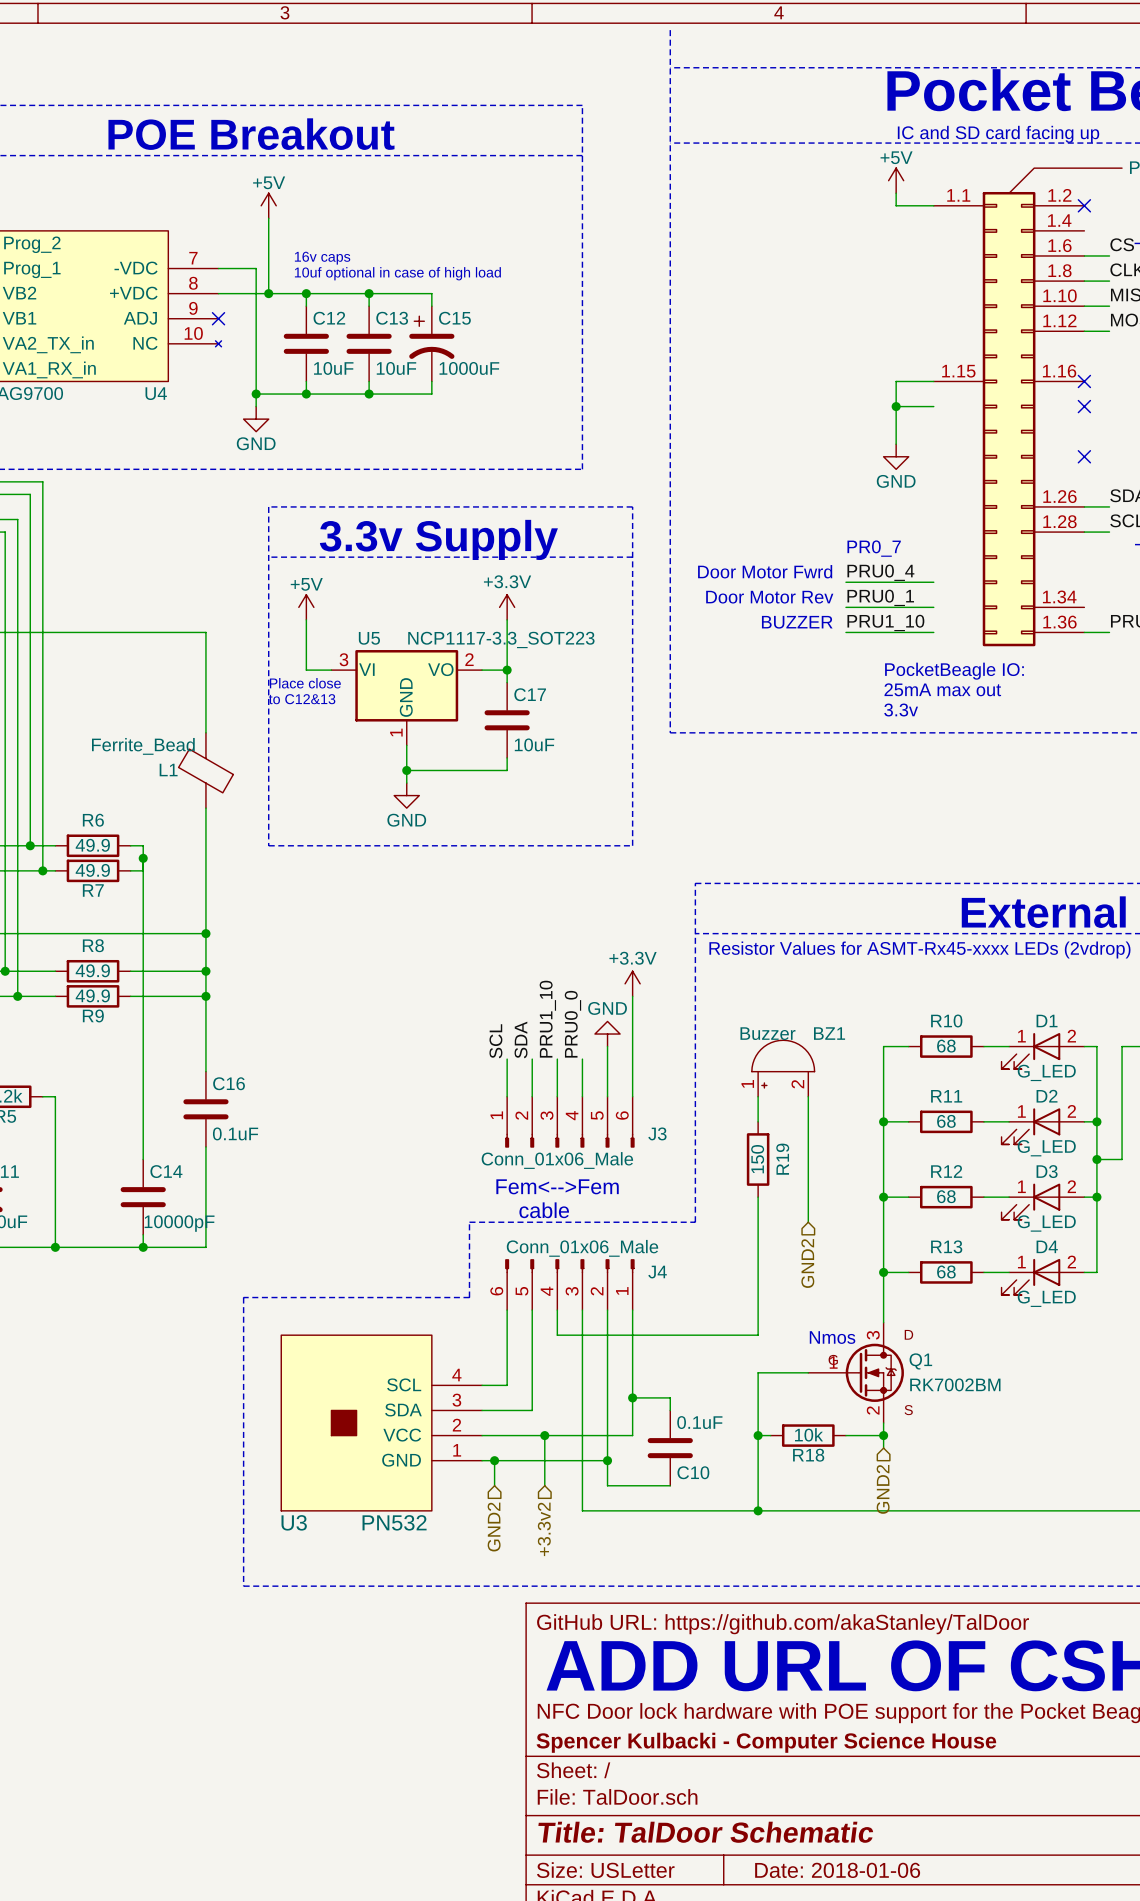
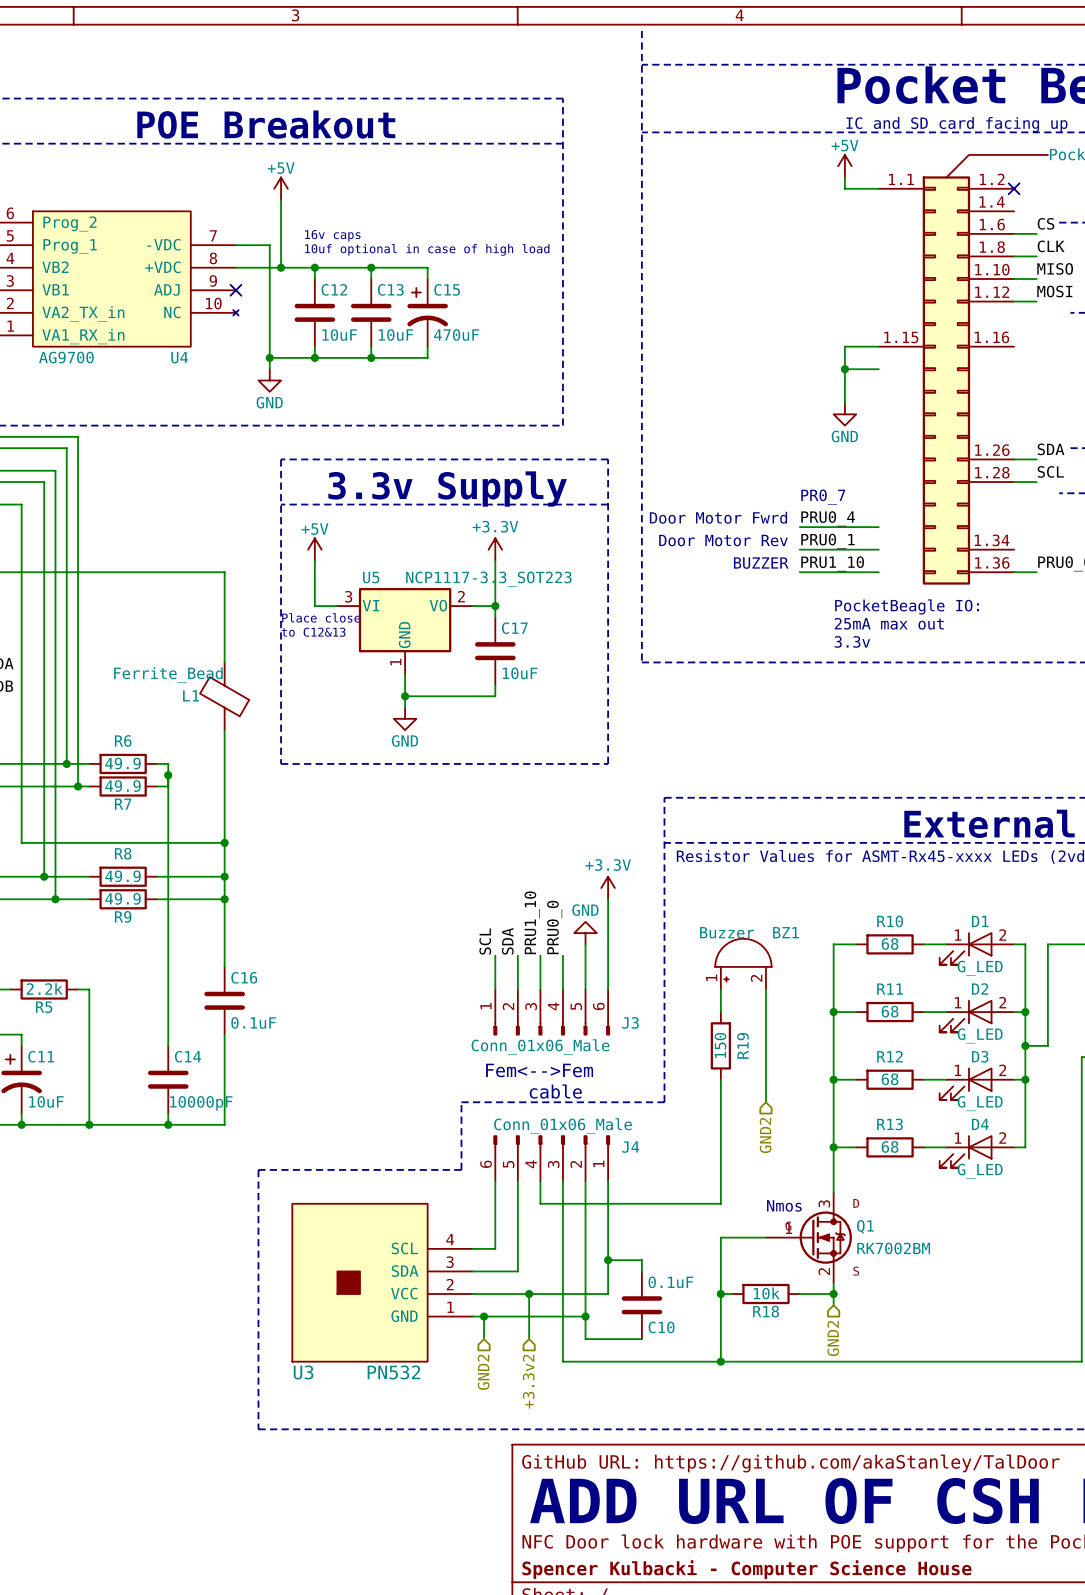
C15 value: 1000uF (469, 368) -> 470uF (456, 334)
no-connect mark: (1084, 381) -> none
no-connect mark: (1084, 406) -> none
no-connect mark: (1084, 456) -> none

